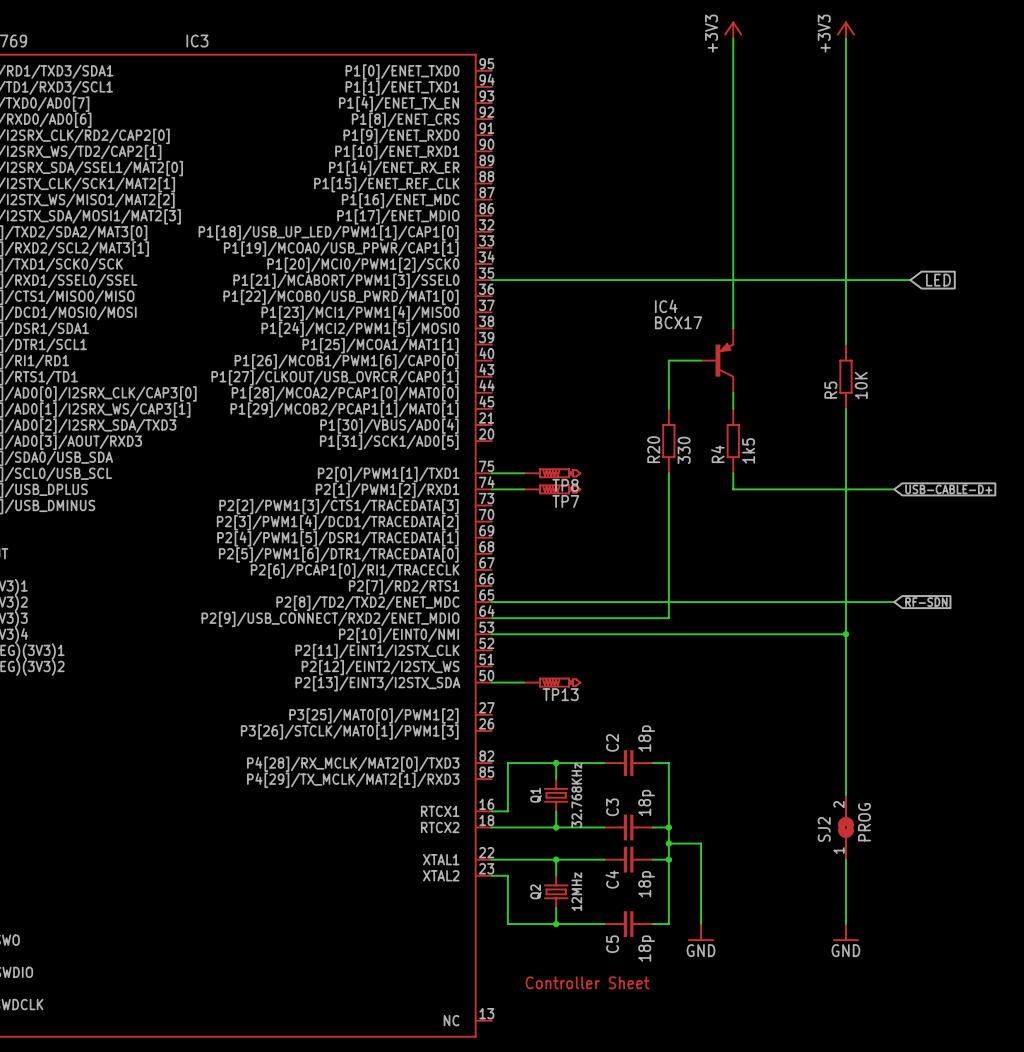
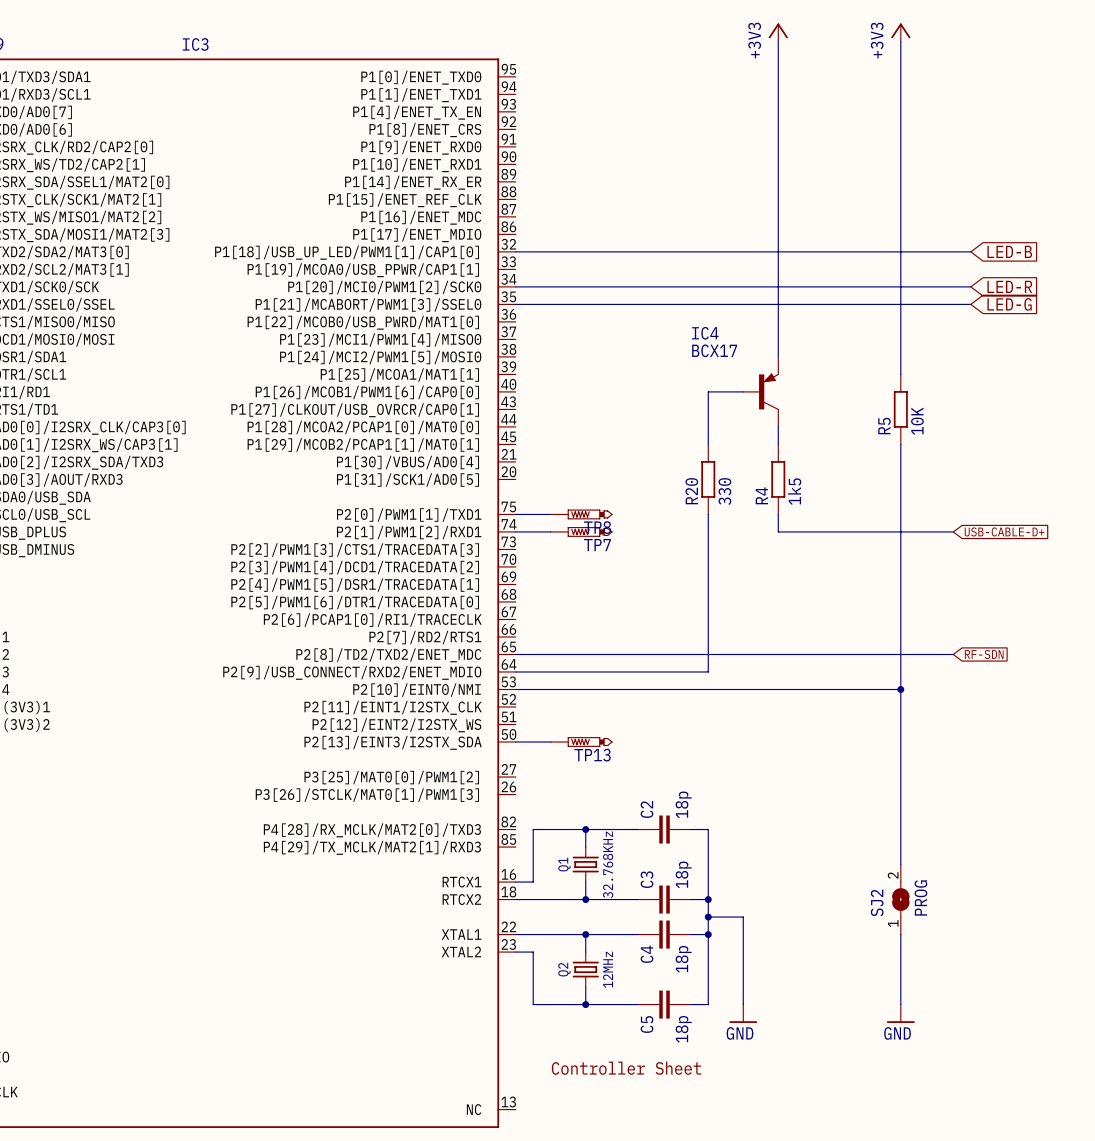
wire: none -> (515, 251) (970, 251)
global label: none -> LED-B (1009, 251)
wire: none -> (515, 286) (970, 286)
global label: none -> LED-R (1009, 286)
global label: LED (938, 280) -> LED-G (1009, 304)

